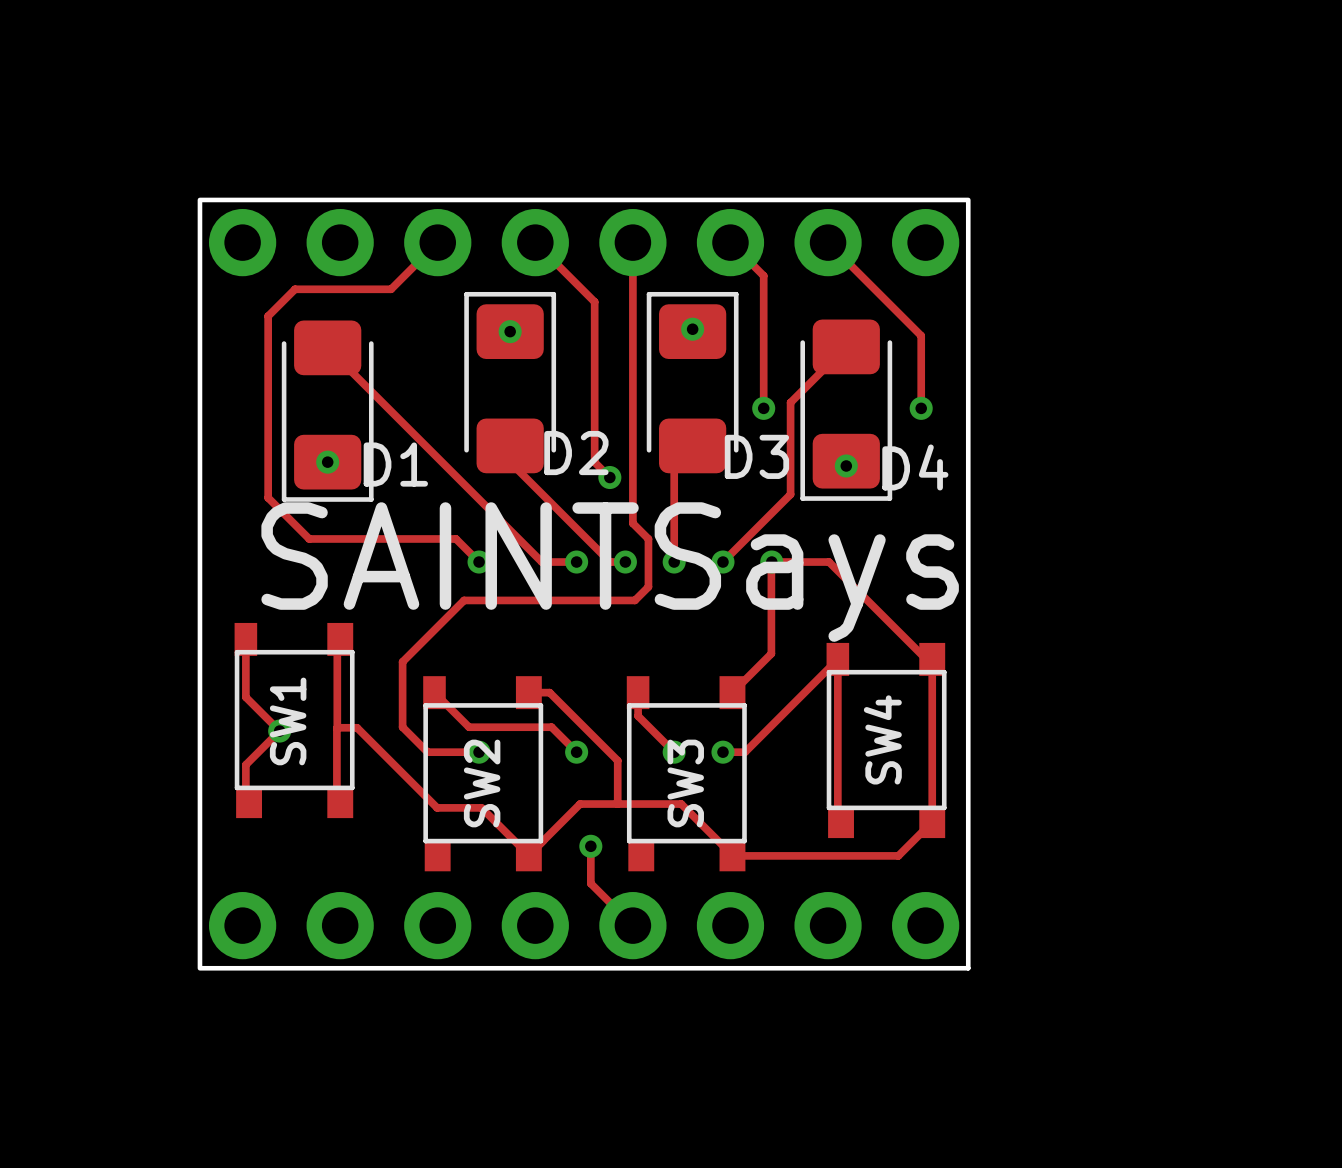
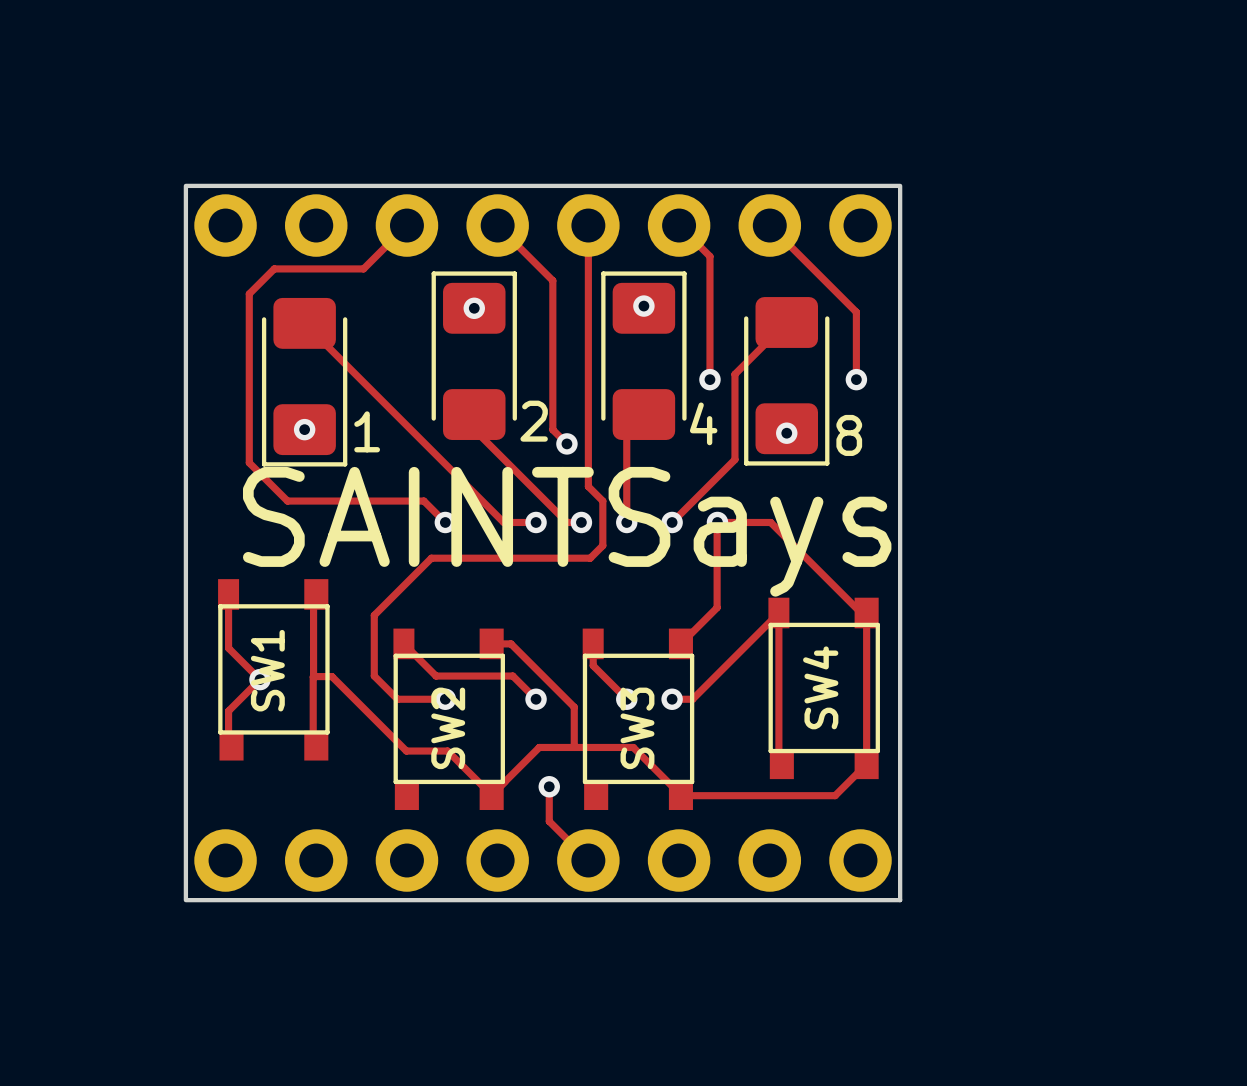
D2 name: D2 (576, 453) -> 2 (534, 421)
D3 name: D3 (756, 456) -> 4 (703, 423)
D1 name: D1 (395, 464) -> 1 (367, 431)
D4 name: D4 (915, 467) -> 8 (849, 435)

